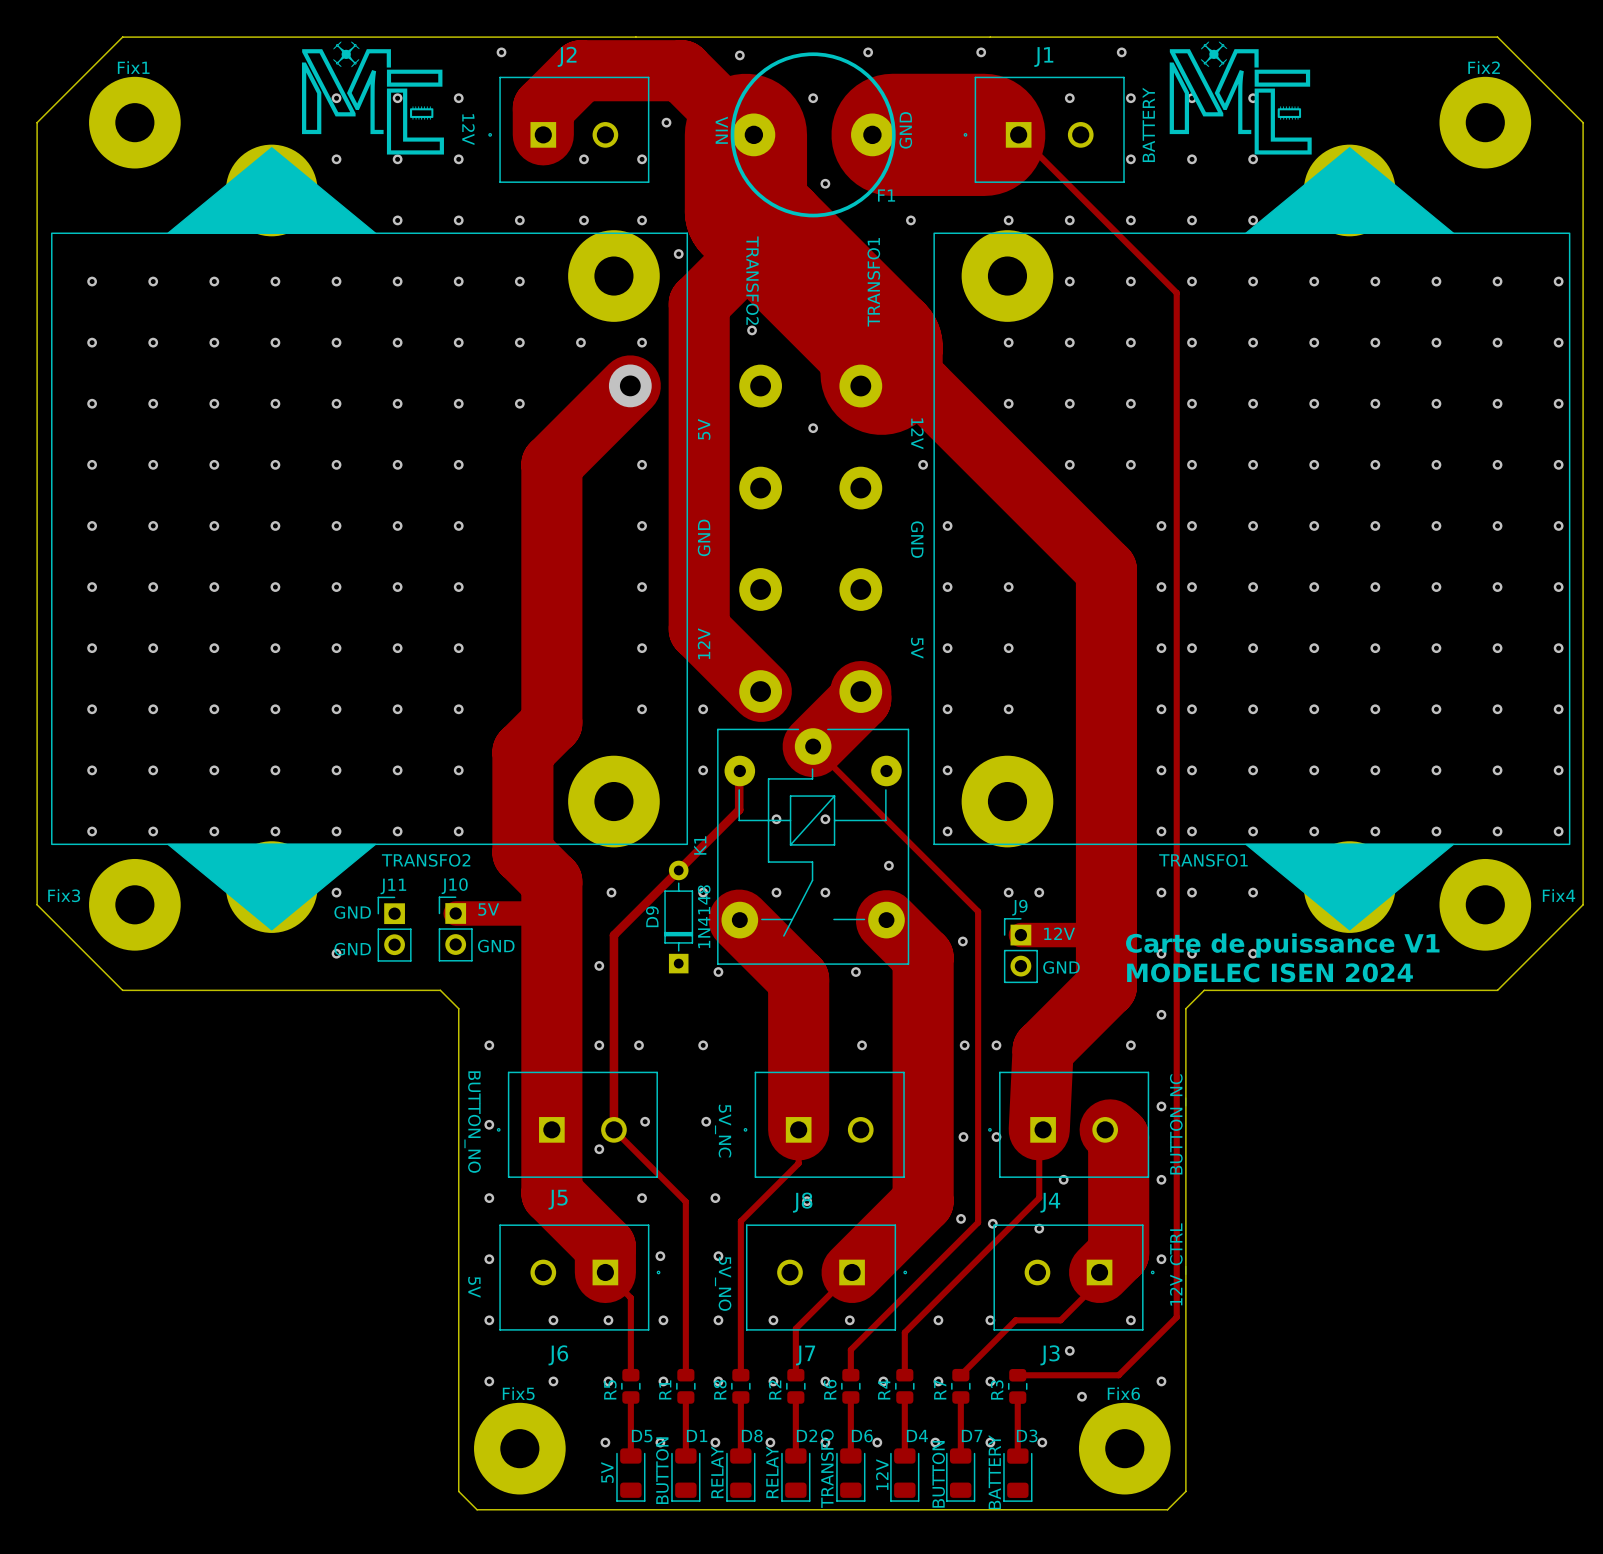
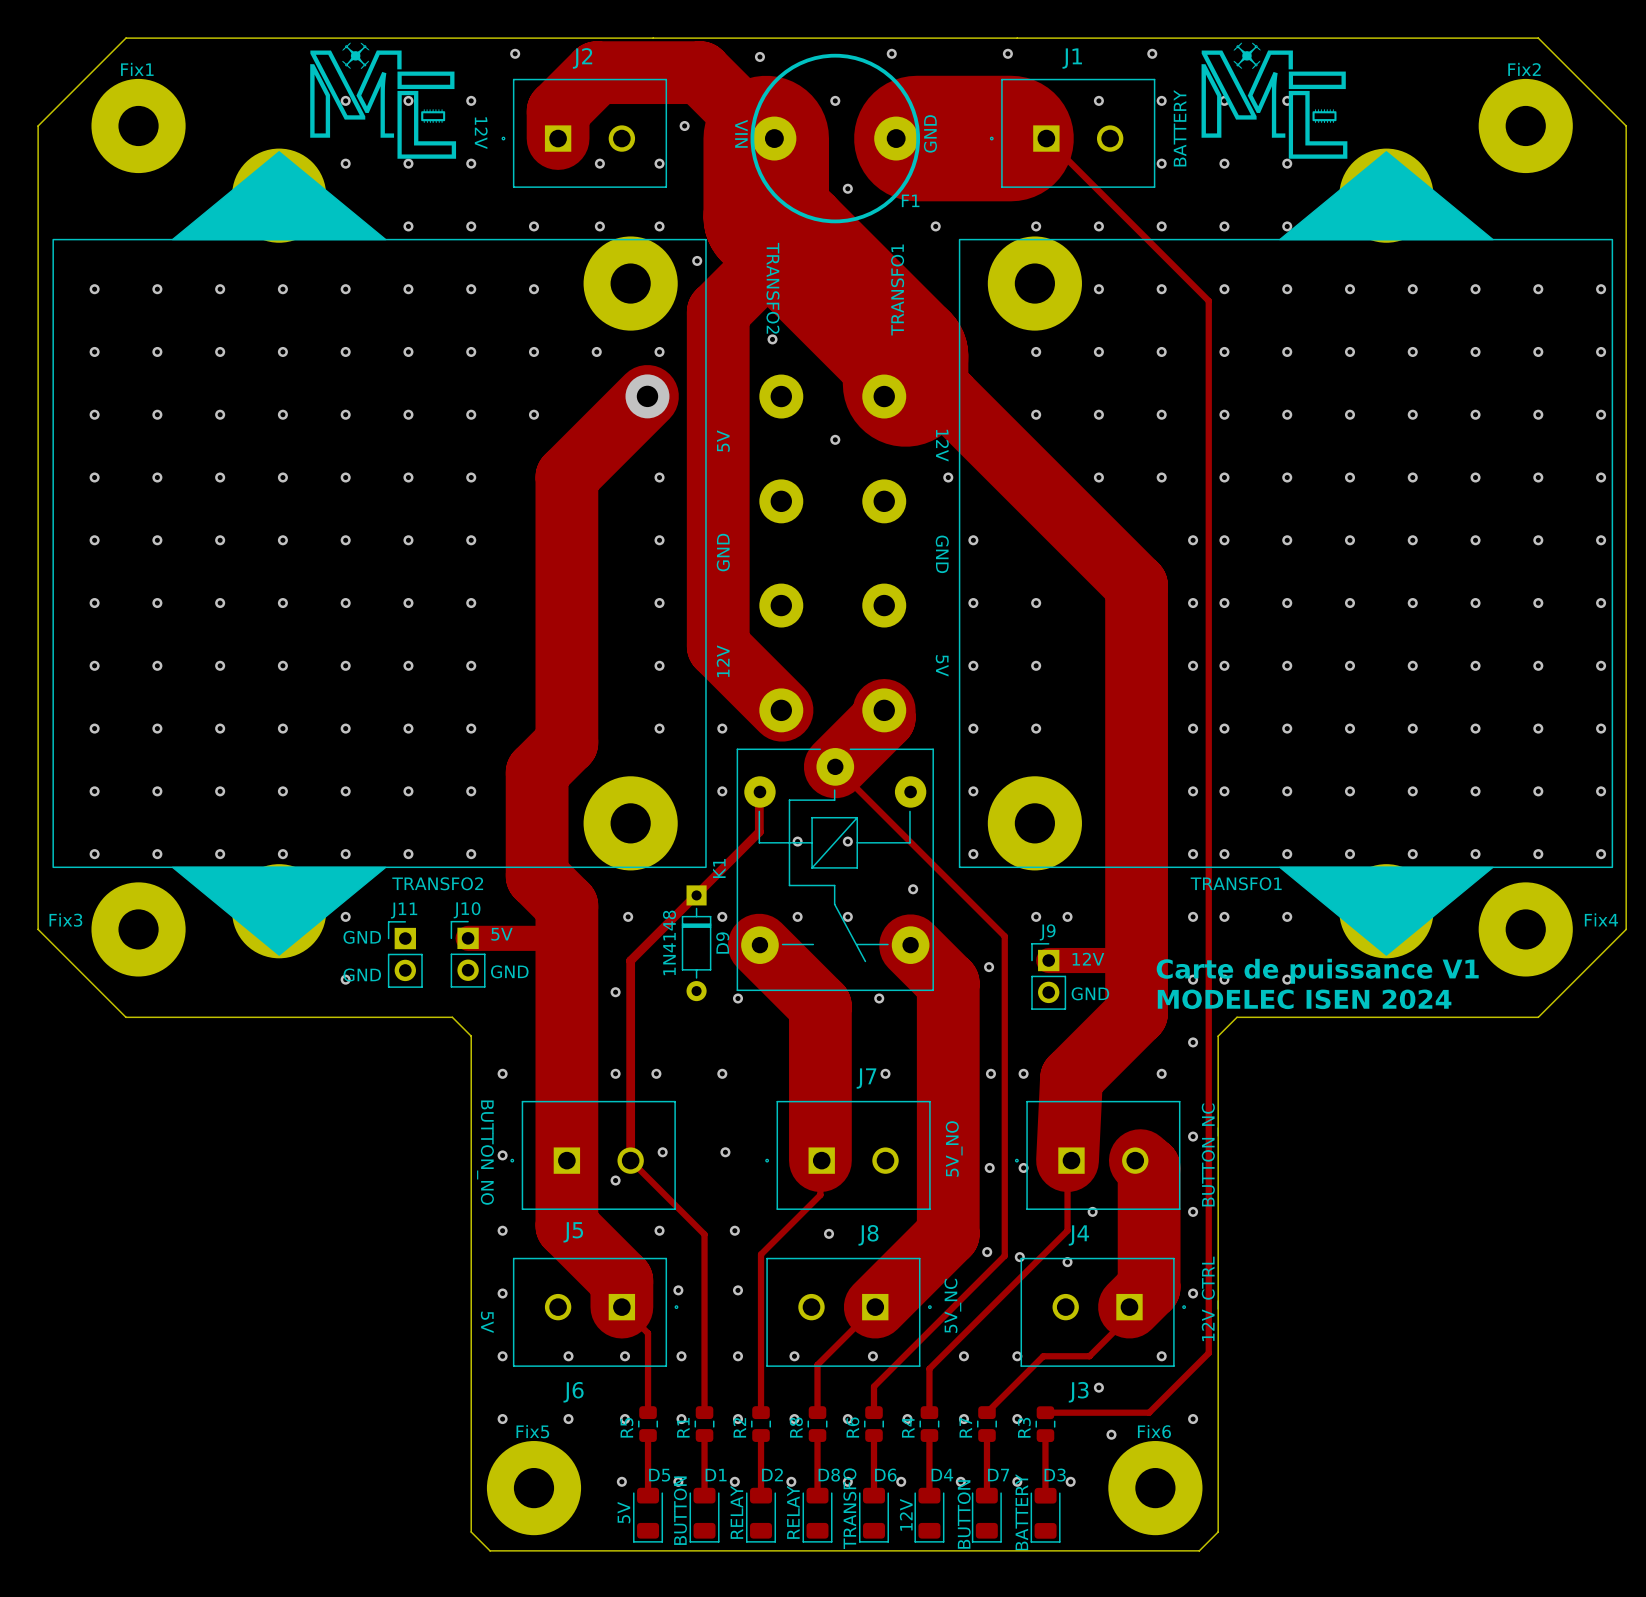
K1 footprint: [717, 728, 910, 965] -> [736, 748, 934, 992]
D9 rotation: 0° (678, 917) -> 180° (696, 943)
J8 rotation: 0° (824, 1124) -> 180° (849, 1312)
J8 position: (824, 1124) -> (849, 1312)
J7 rotation: 0° (826, 1277) -> 180° (847, 1155)
J7 position: (826, 1277) -> (847, 1155)
R8 name: R8 (720, 1389) -> R2 (739, 1427)
R2 name: R2 (775, 1390) -> R8 (796, 1427)
D8 name: D8 (752, 1435) -> D2 (772, 1474)
D2 name: D2 (807, 1435) -> D8 (829, 1475)

